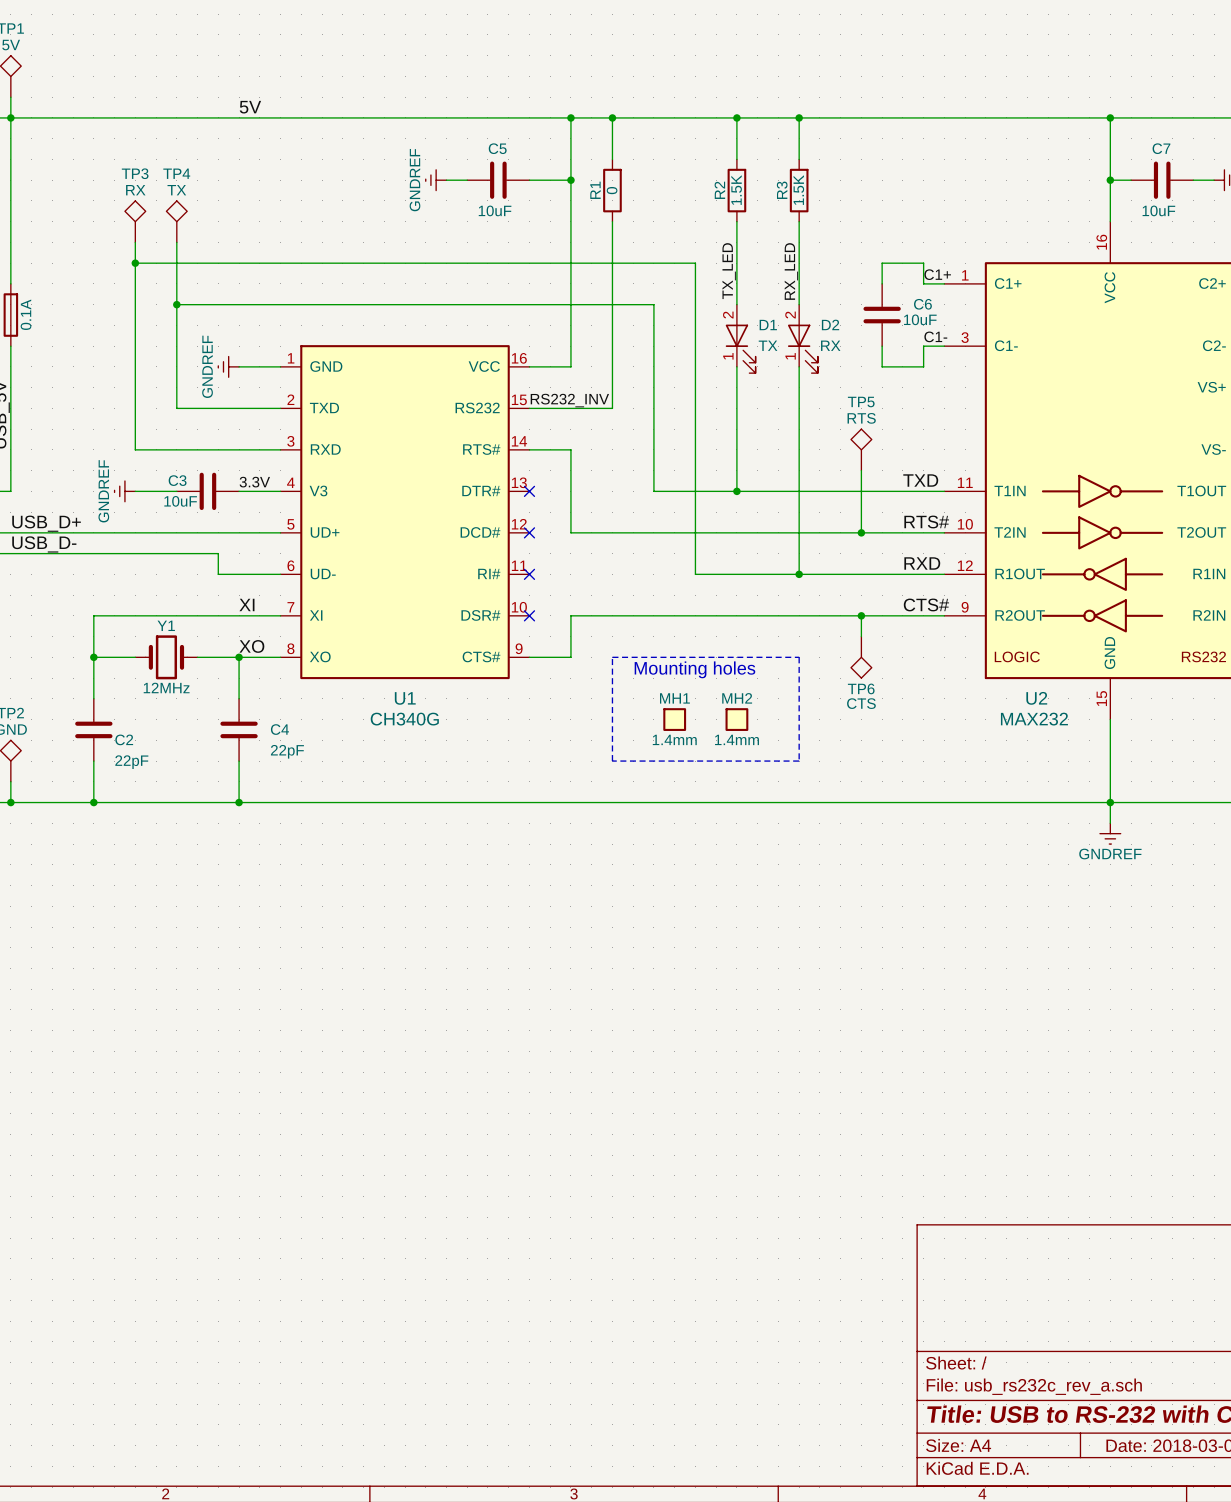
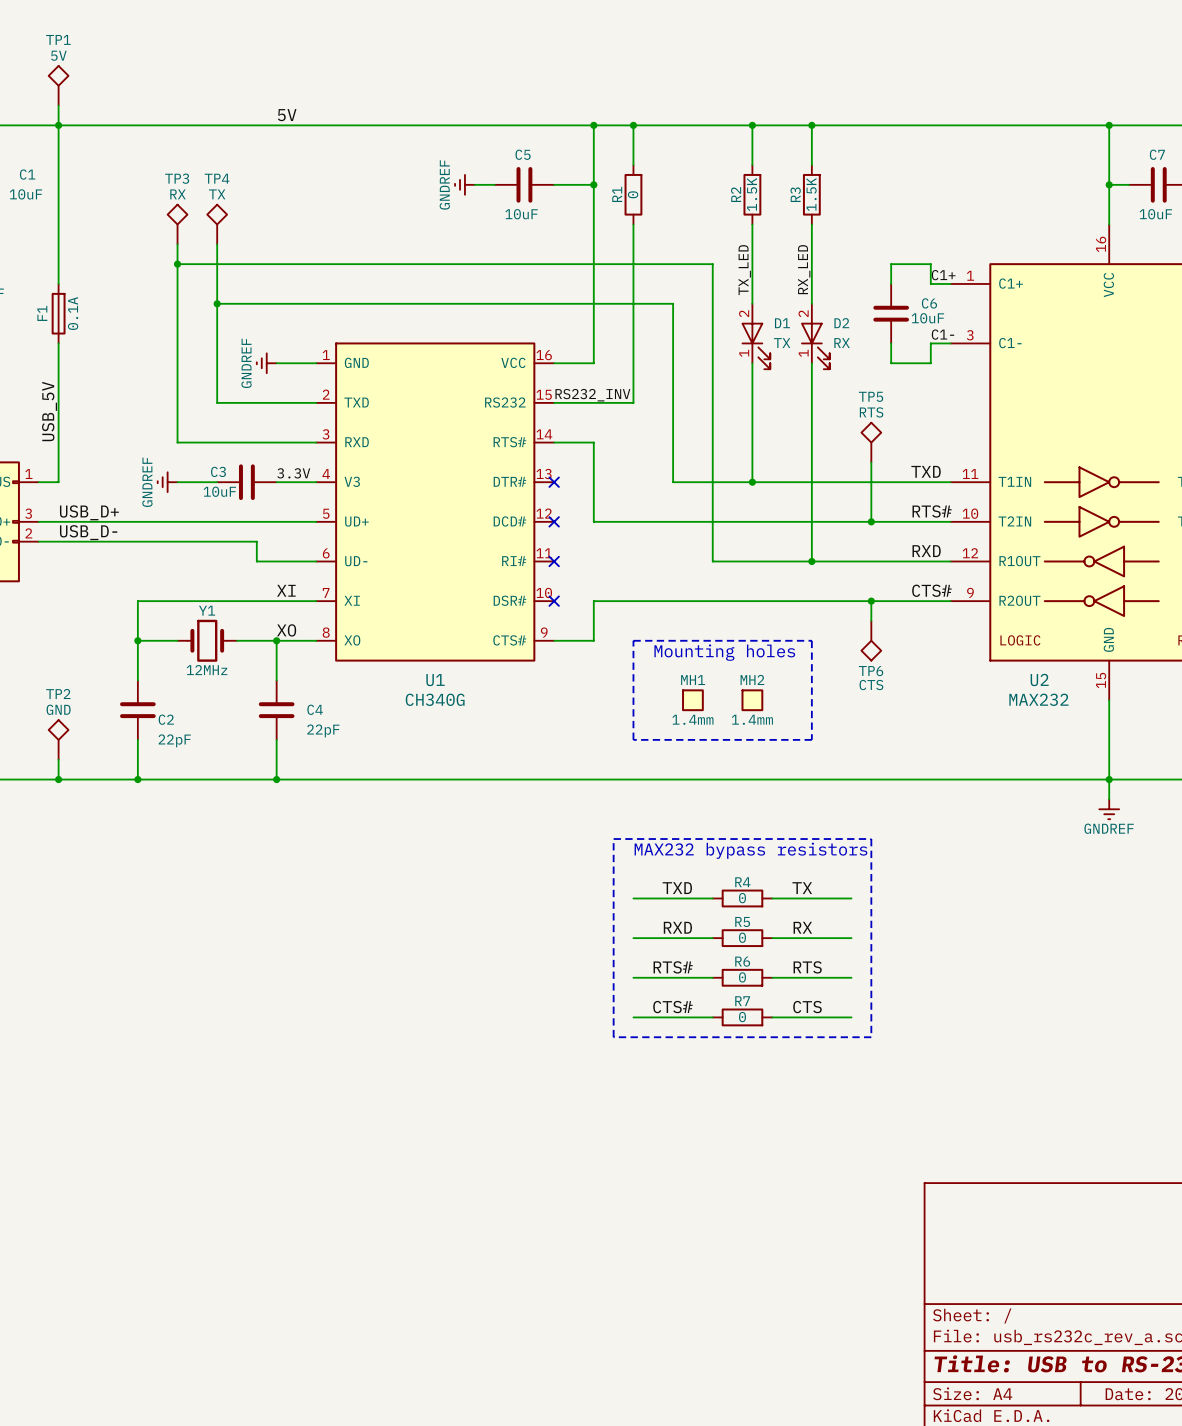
line: none -> (613, 839) (871, 839) (871, 1037) (613, 1037) (613, 839)
text: none -> MAX232 bypass resistors (750, 850)
label: none -> TXD (677, 888)
label: none -> TX (802, 888)
wire: none -> (633, 898) (712, 898)
R4: none -> 0 (742, 898)
wire: none -> (772, 898) (851, 898)
label: none -> RXD (677, 927)
label: none -> RX (802, 927)
wire: none -> (633, 938) (712, 938)
R5: none -> 0 (742, 938)
wire: none -> (772, 938) (851, 938)
label: none -> RTS# (673, 967)
label: none -> RTS (807, 967)
wire: none -> (633, 977) (712, 977)
R6: none -> 0 (742, 977)
wire: none -> (772, 977) (851, 977)
label: none -> CTS# (672, 1007)
label: none -> CTS (807, 1007)
wire: none -> (633, 1017) (712, 1017)
R7: none -> 0 (742, 1017)
wire: none -> (772, 1017) (851, 1017)

